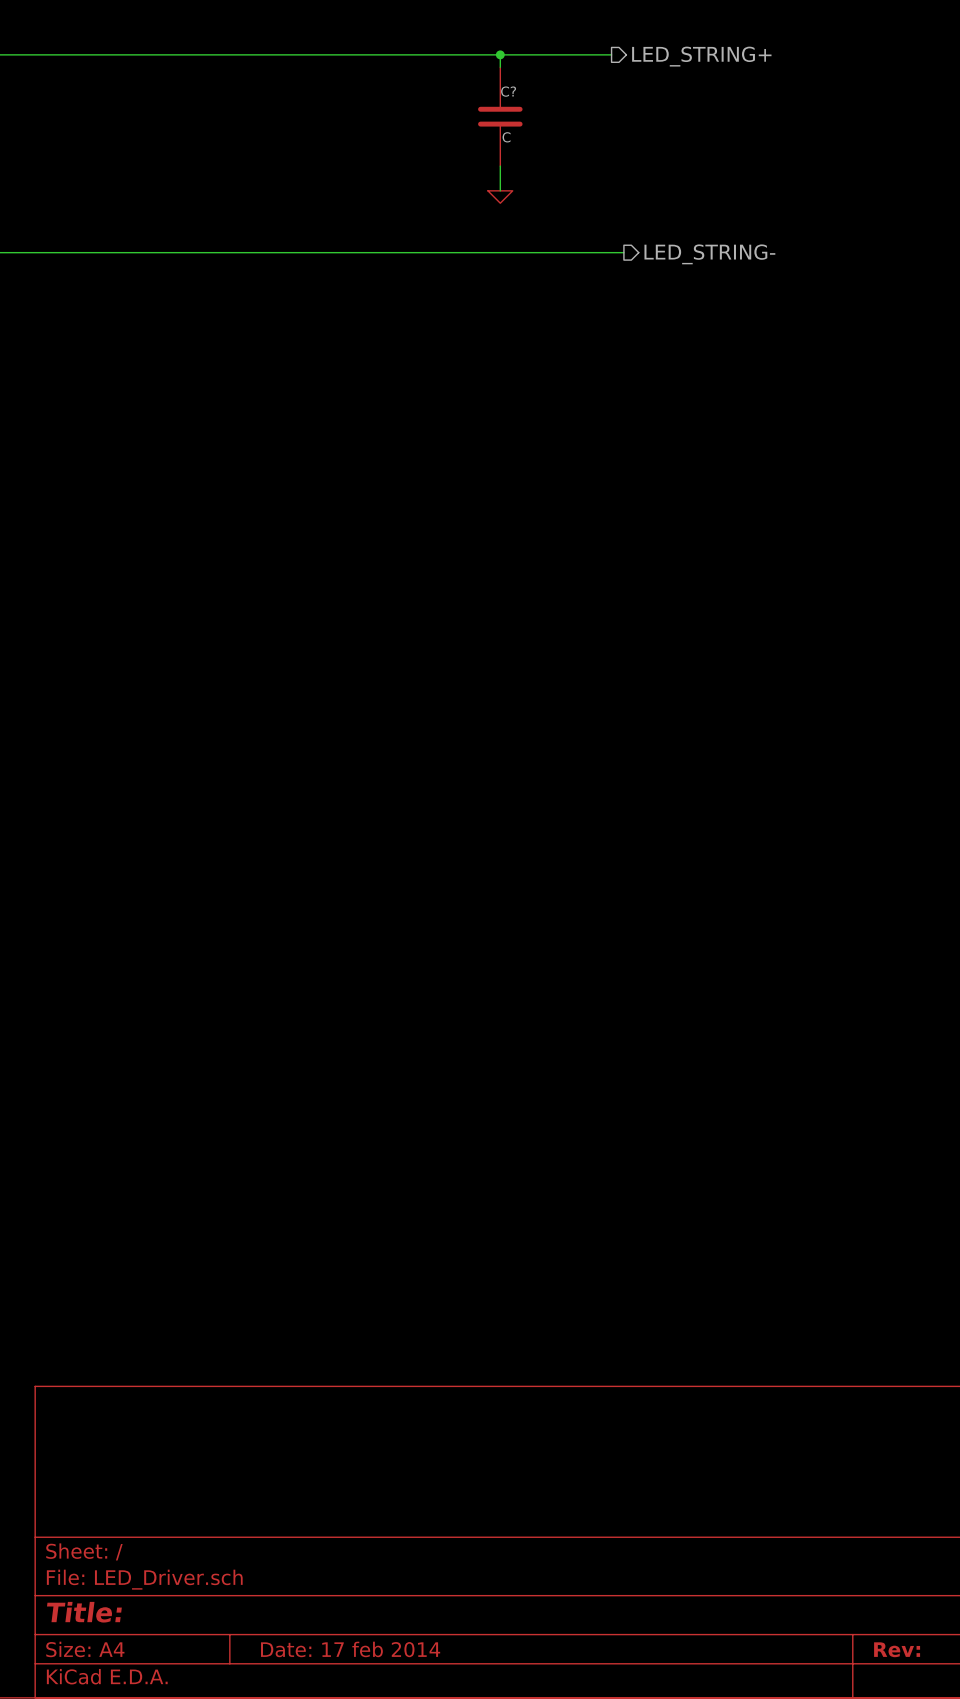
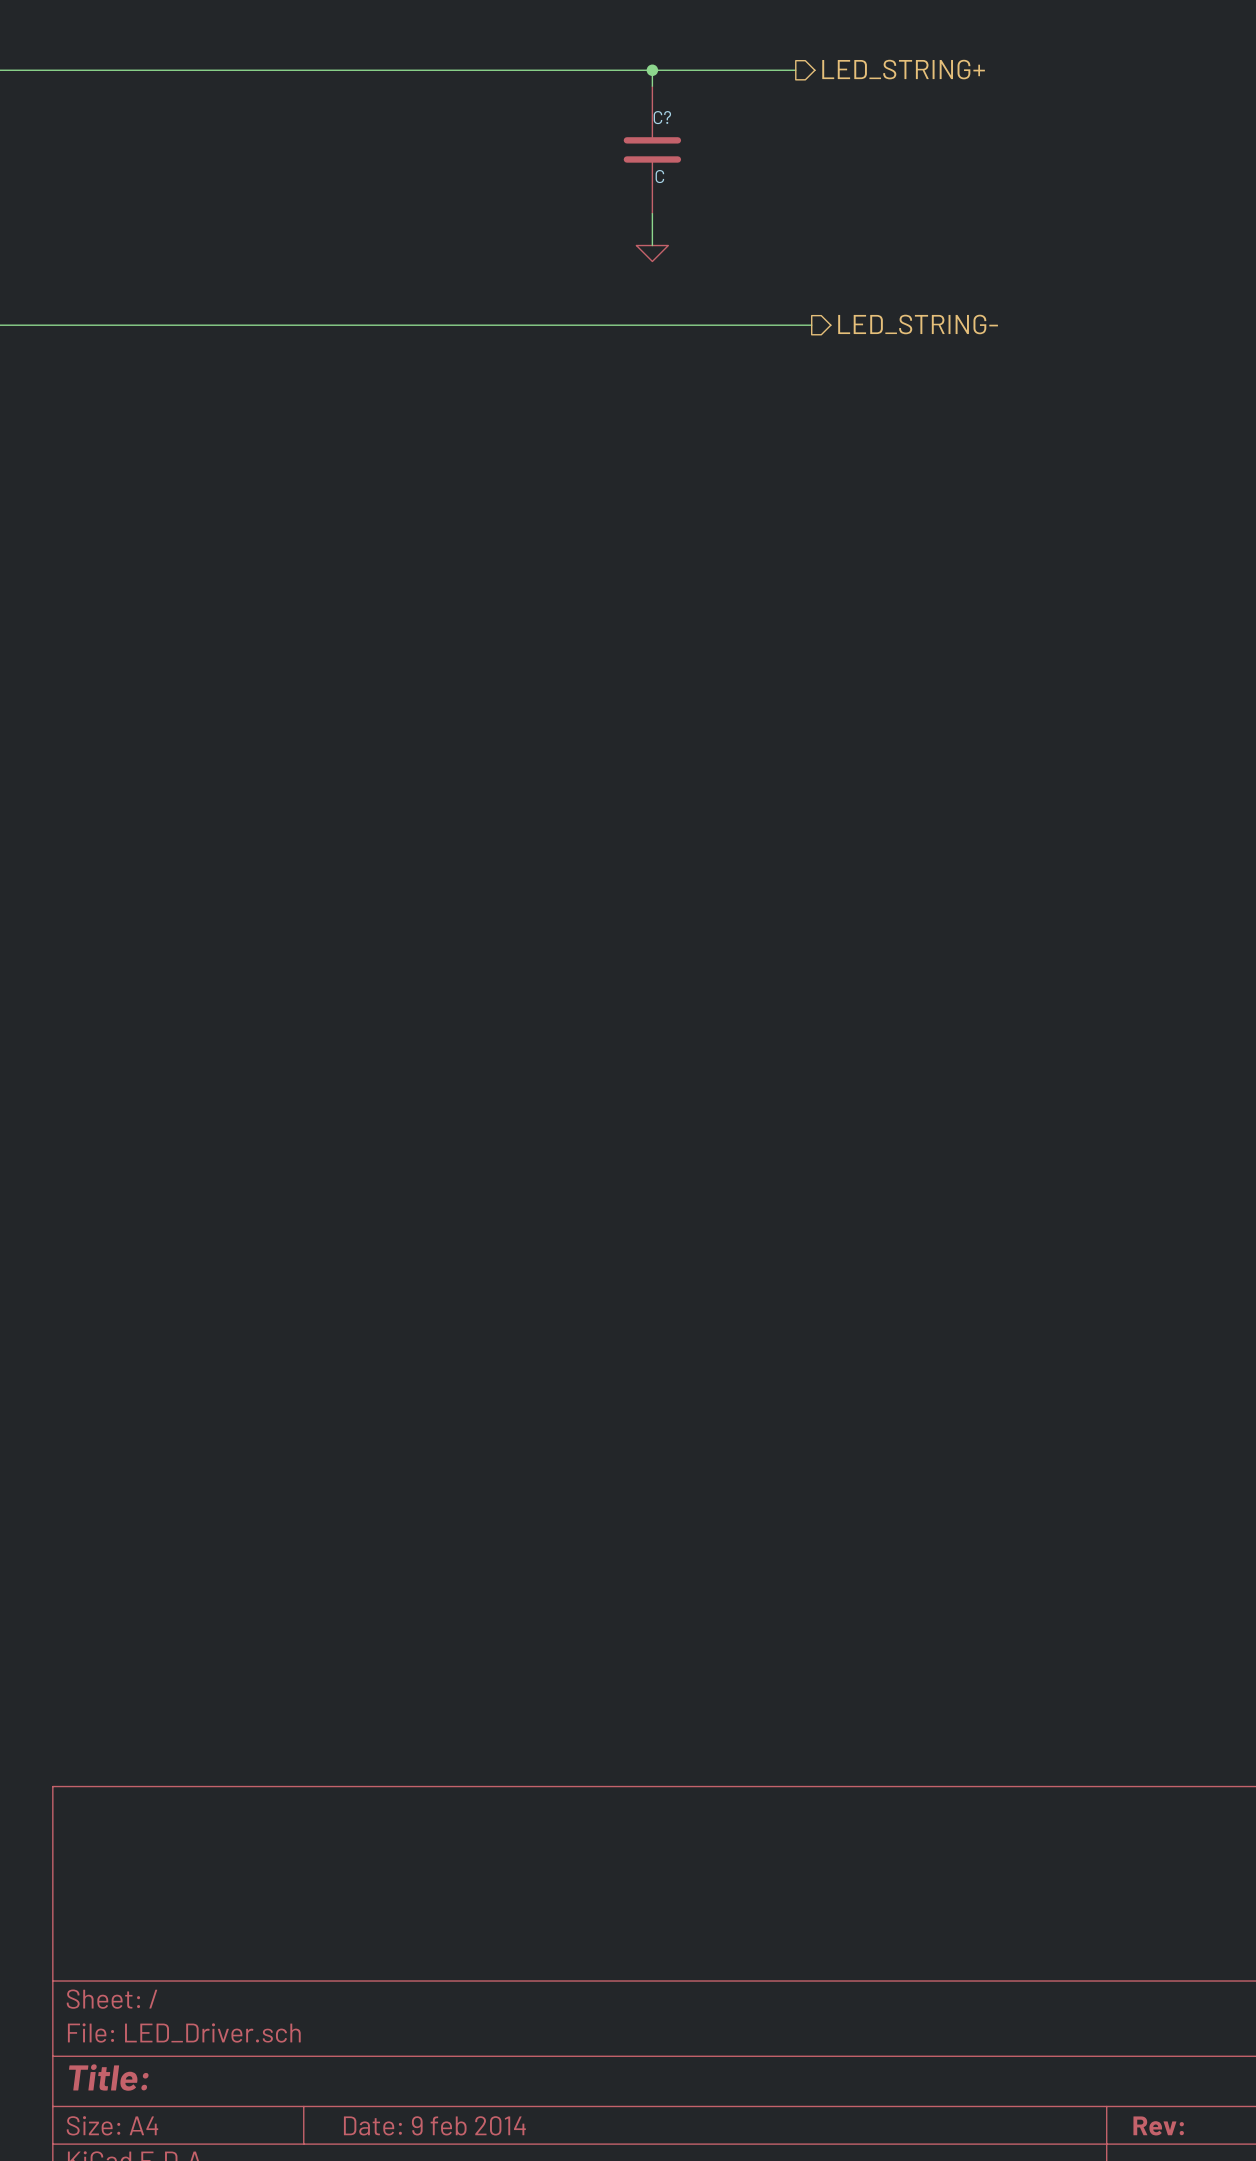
title block: Date: 17 feb 2014 (350, 1649) -> Date: 9 feb 2014 (434, 2125)

